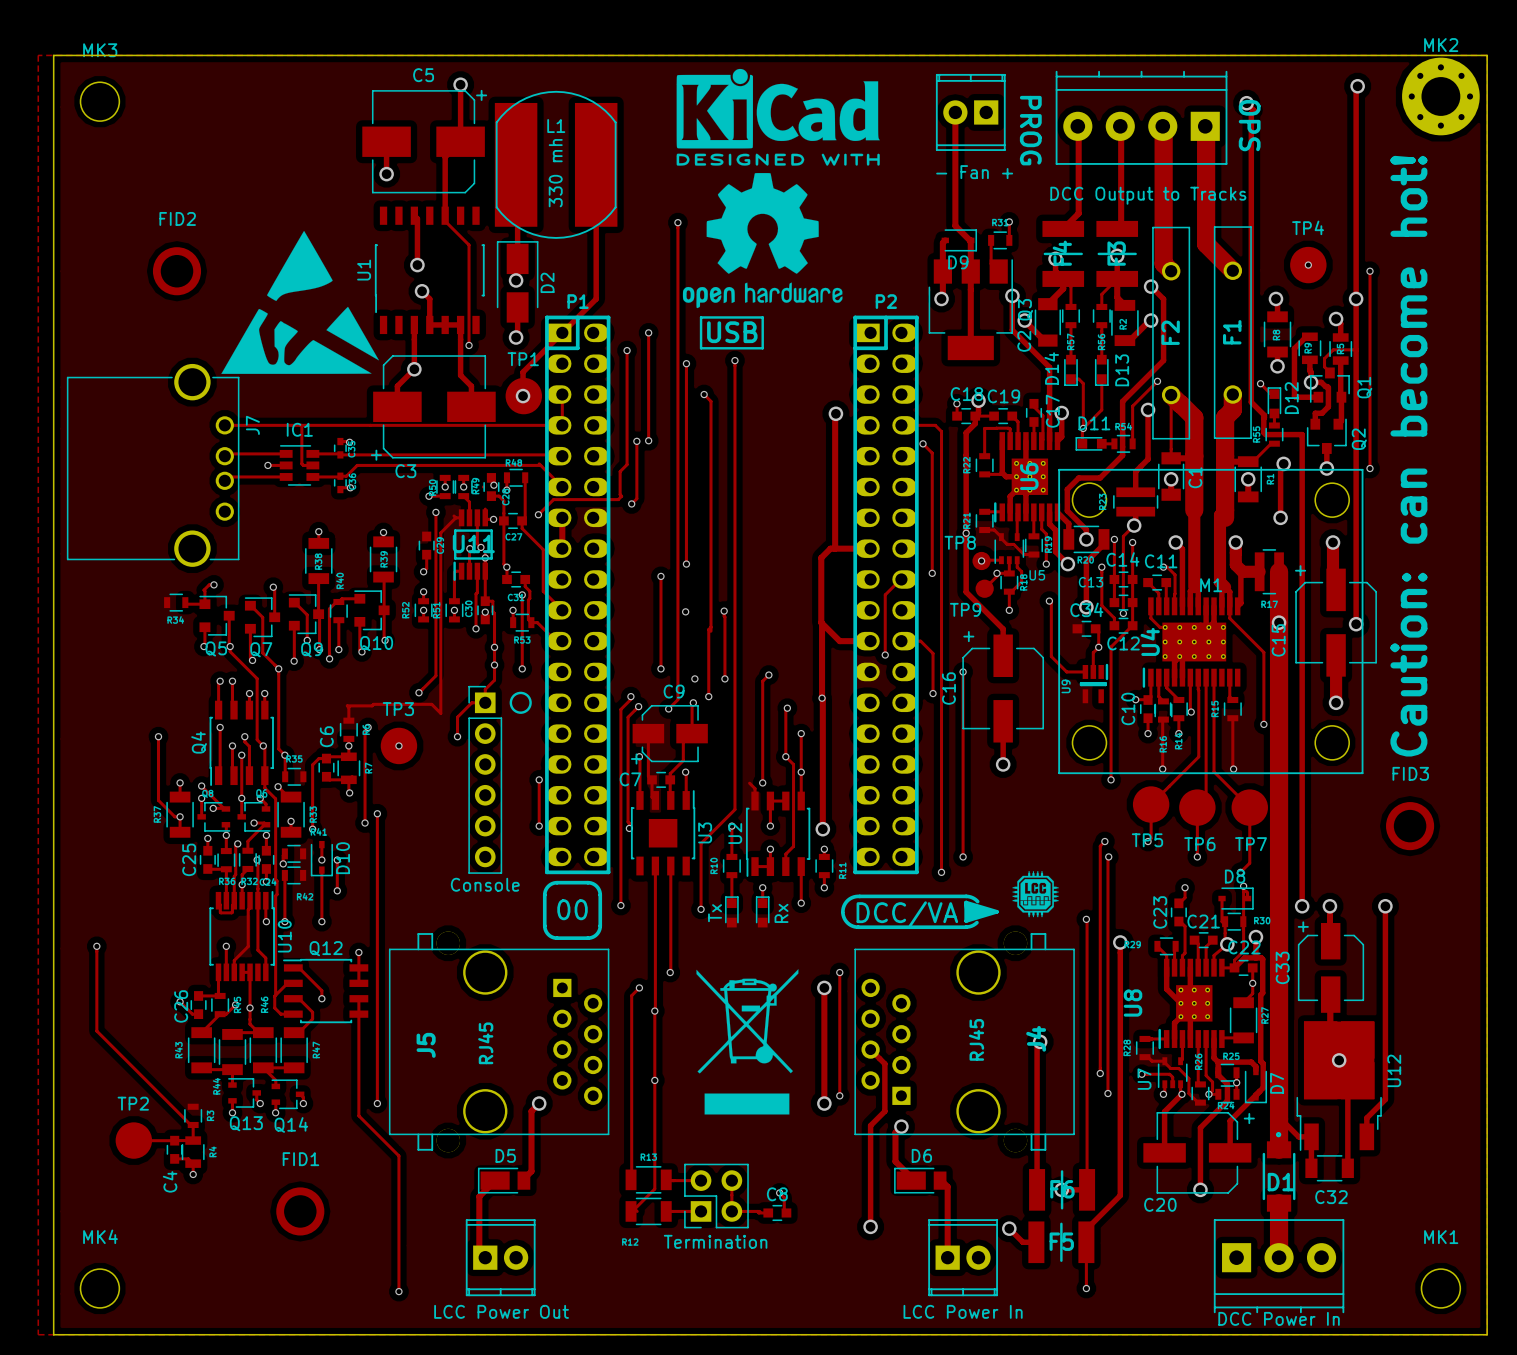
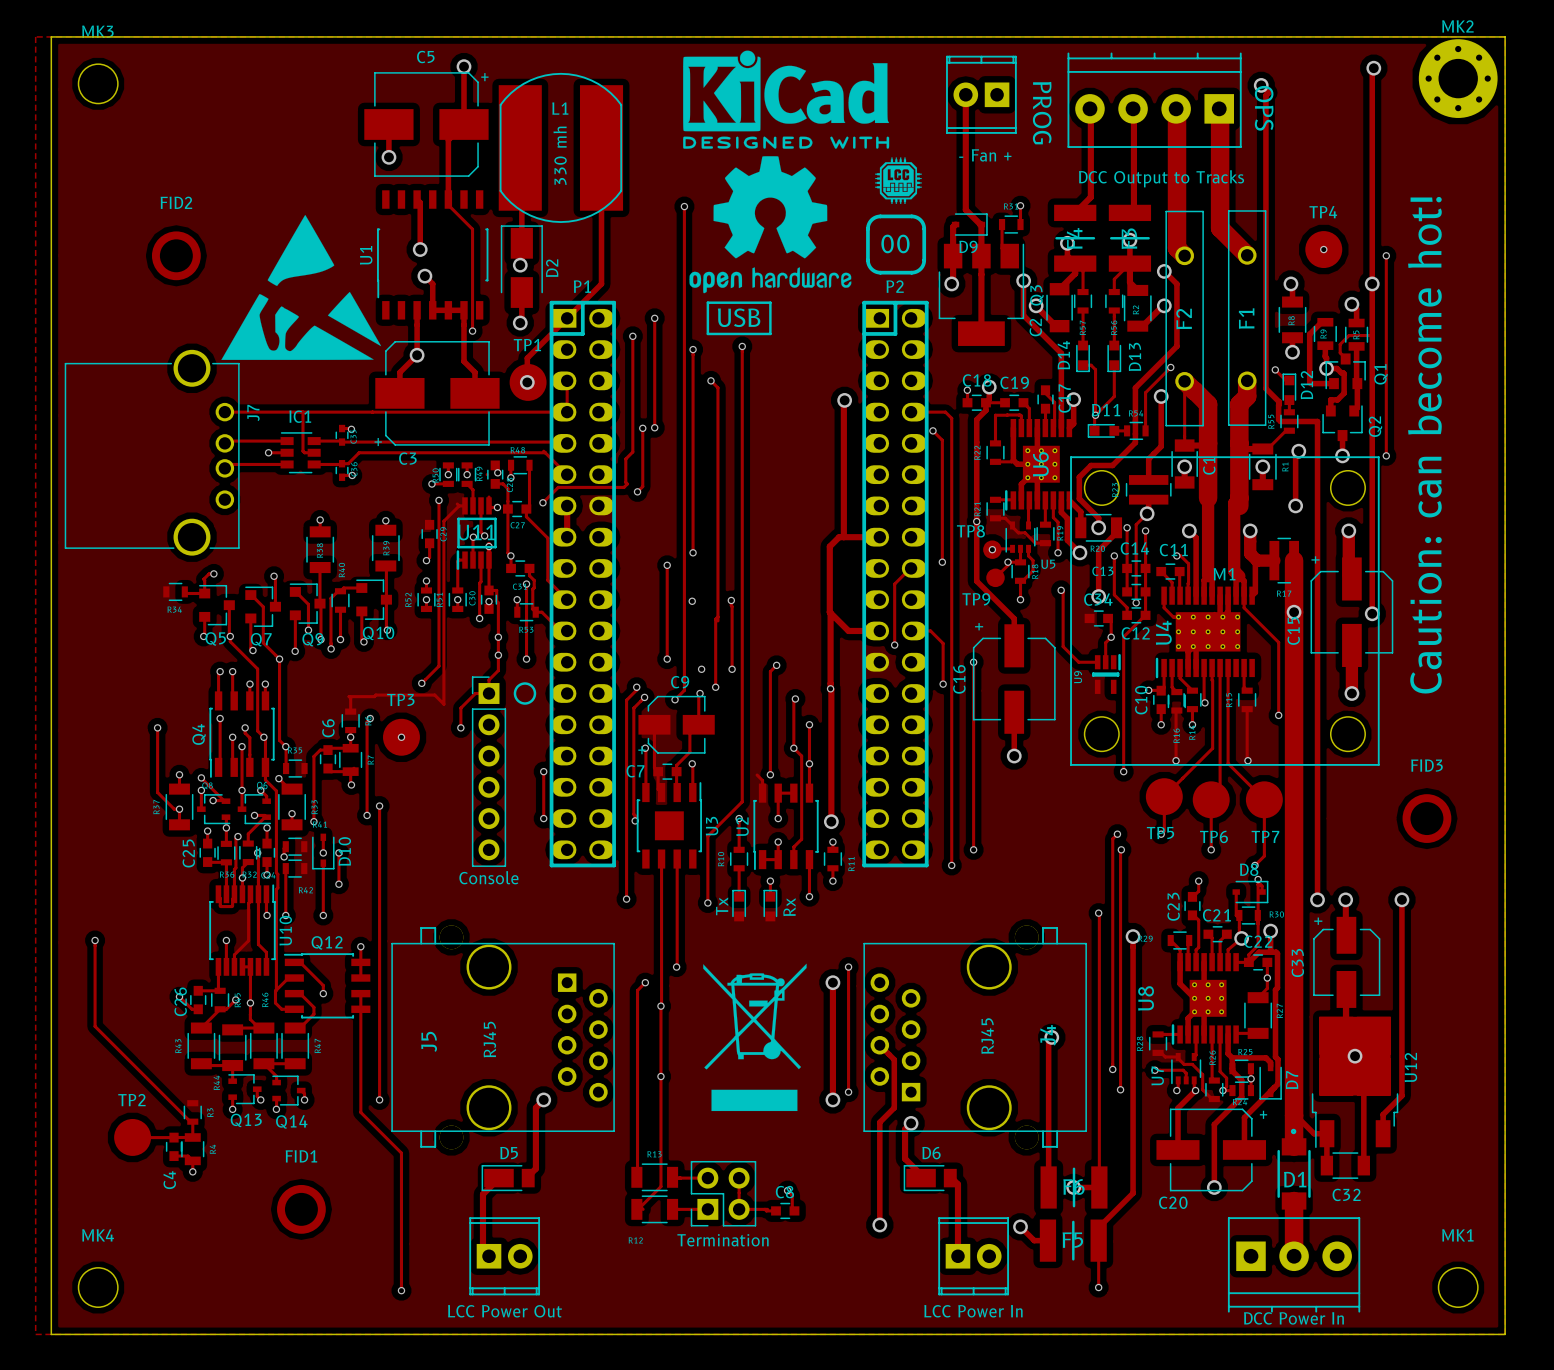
drawing: none -> [866, 157, 927, 275]
drawing: [841, 871, 1059, 930] -> none
drawing: [542, 880, 603, 940] -> none

